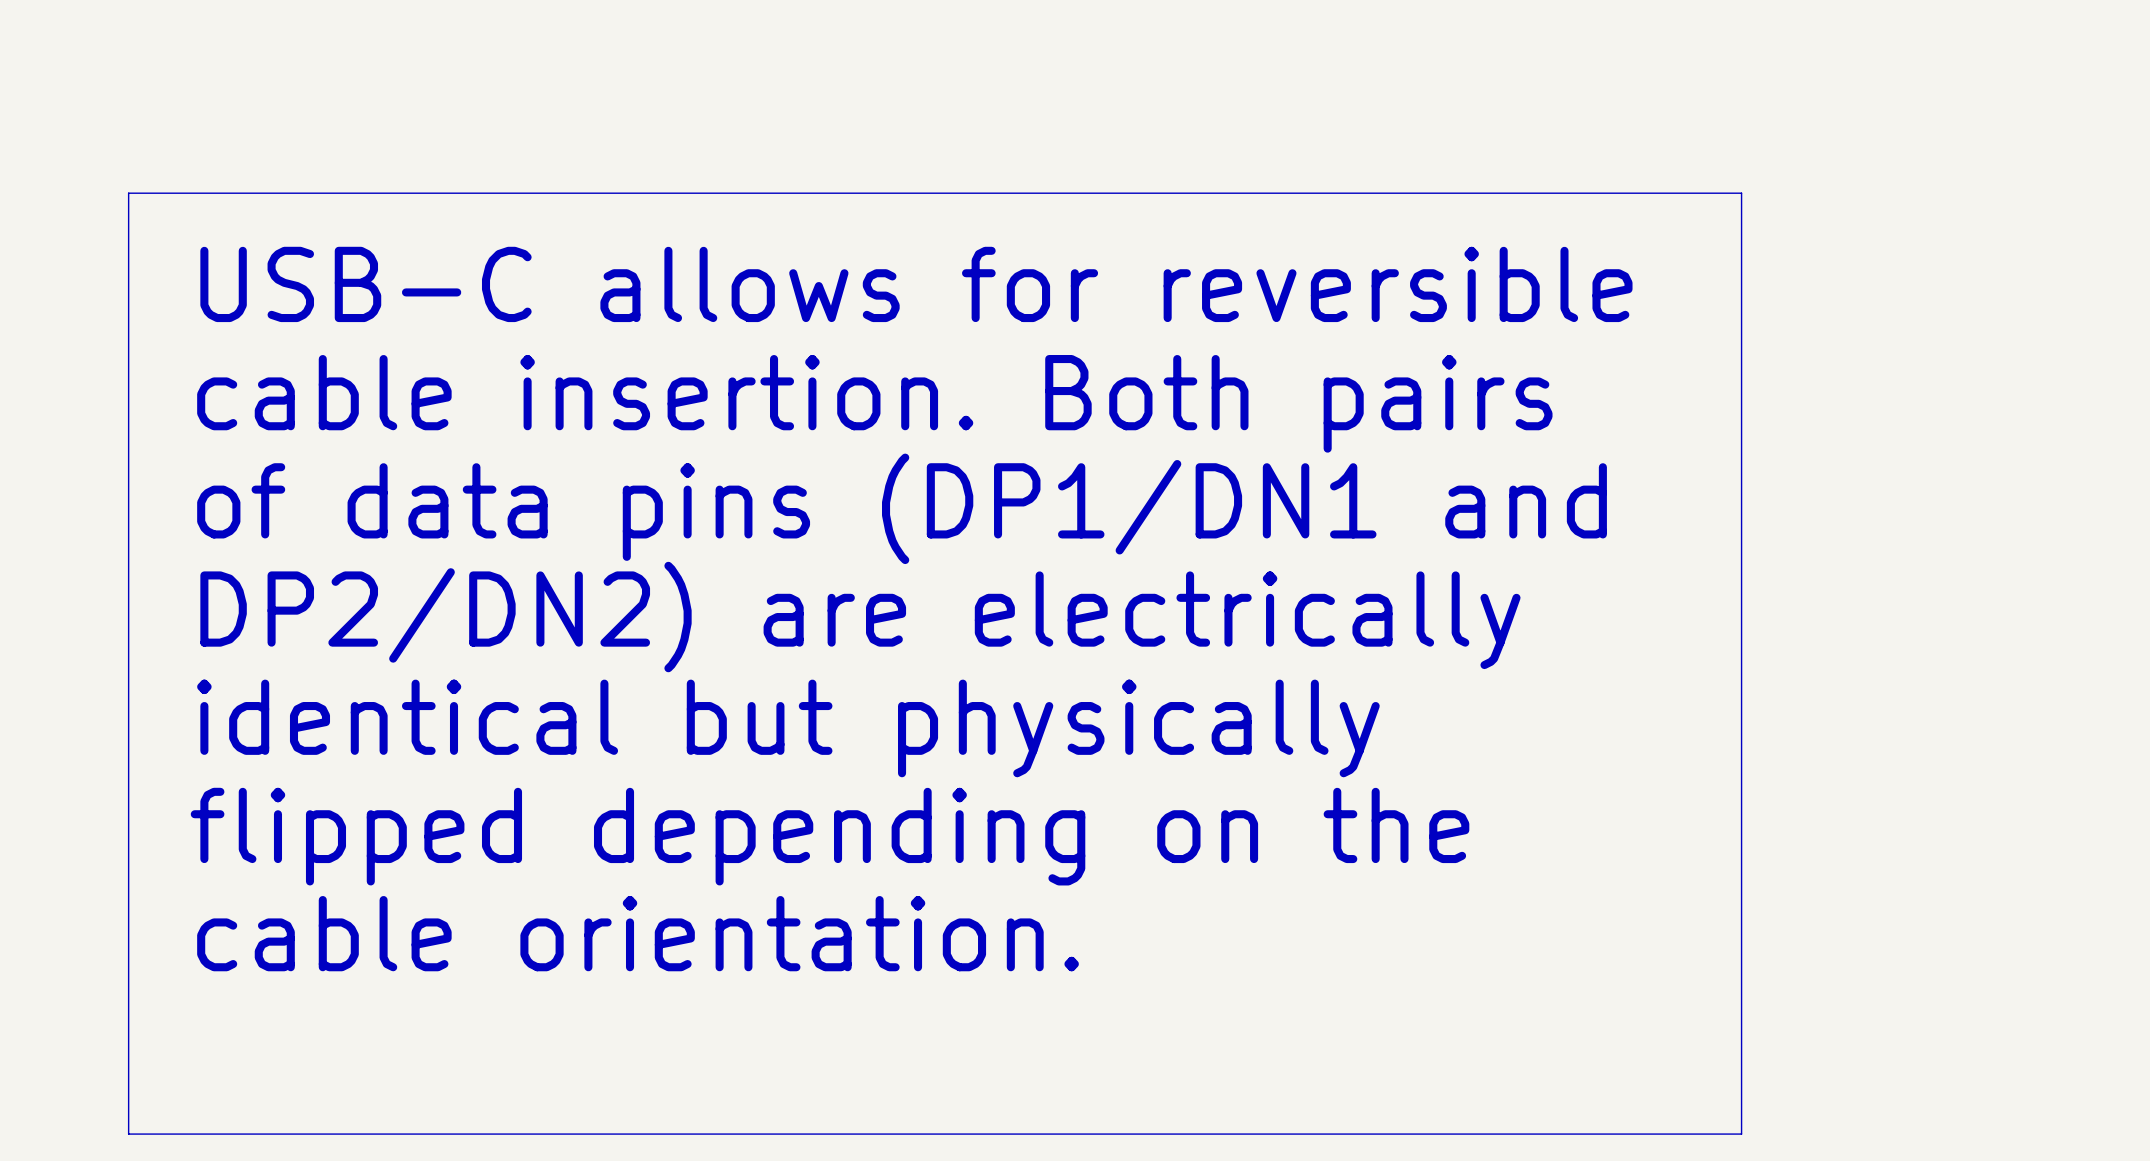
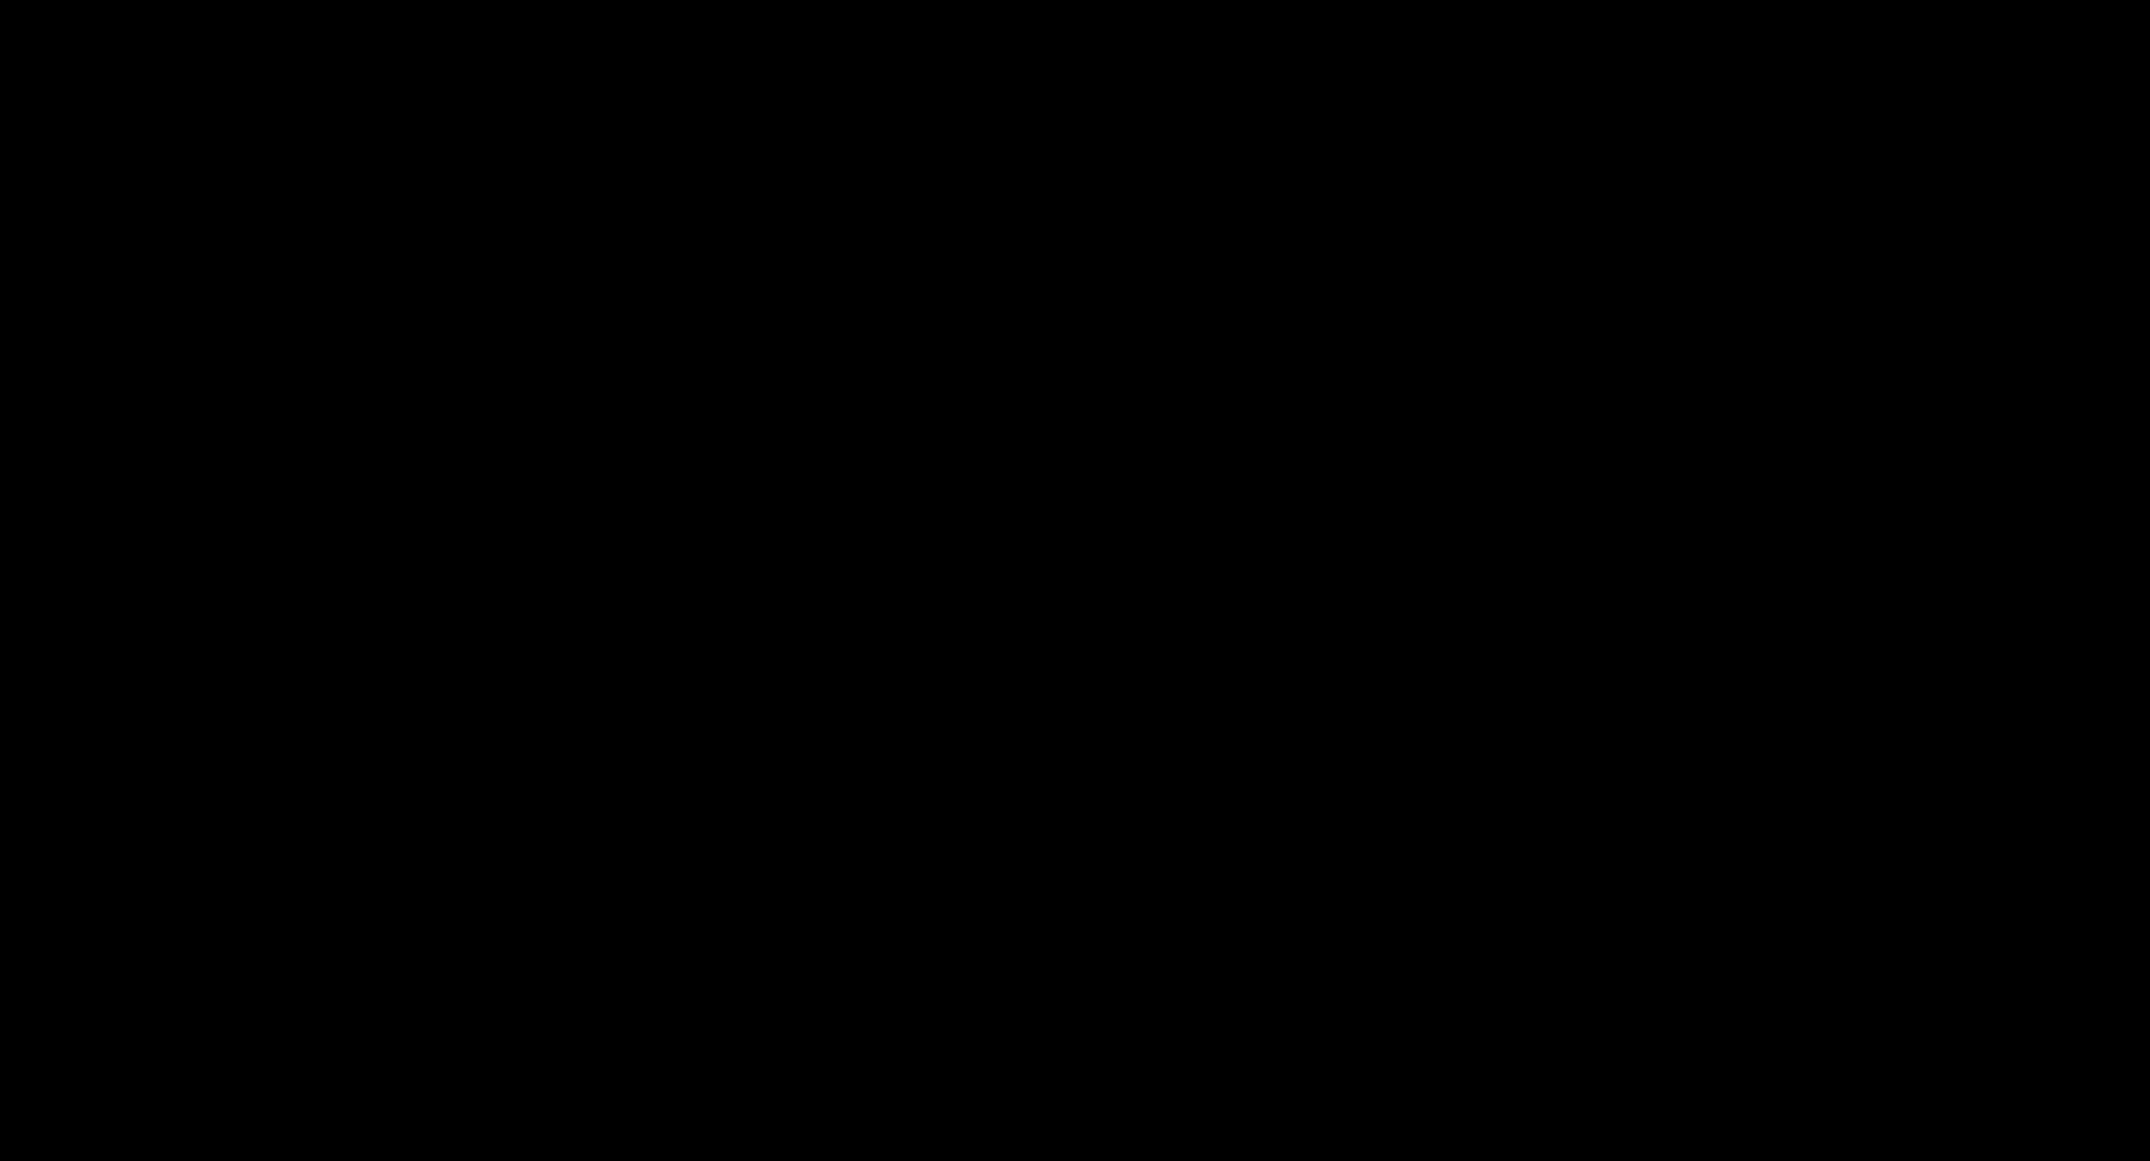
line: (128, 193) (1741, 193) (1741, 1134) (128, 1134) (128, 193) -> none
text: USB-C allows for reversible (916, 284) -> none
text: cable insertion. Both pairs (874, 403) -> none
text: of data pins (DP1/DN1 and (902, 508) -> none
text: DP2/DN2) are electrically (860, 617) -> none
text: identical but physically (788, 728) -> none
text: flipped depending on the (830, 836) -> none
text: cable orientation. (638, 933) -> none

